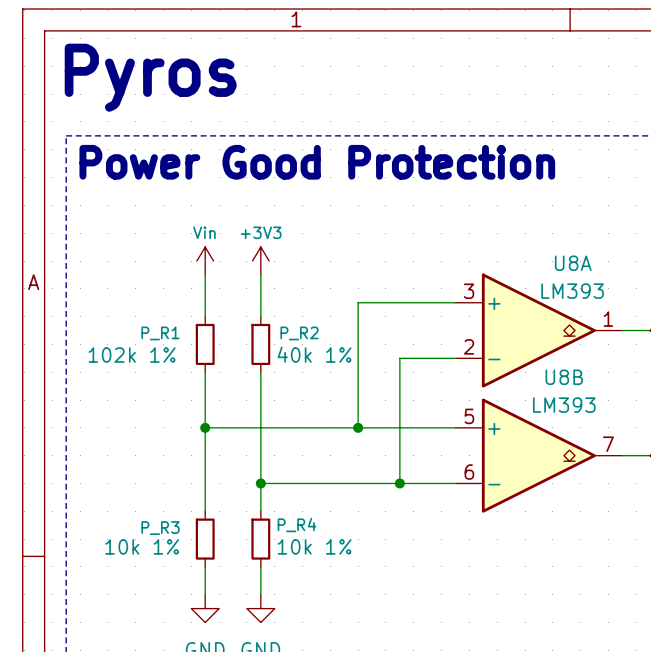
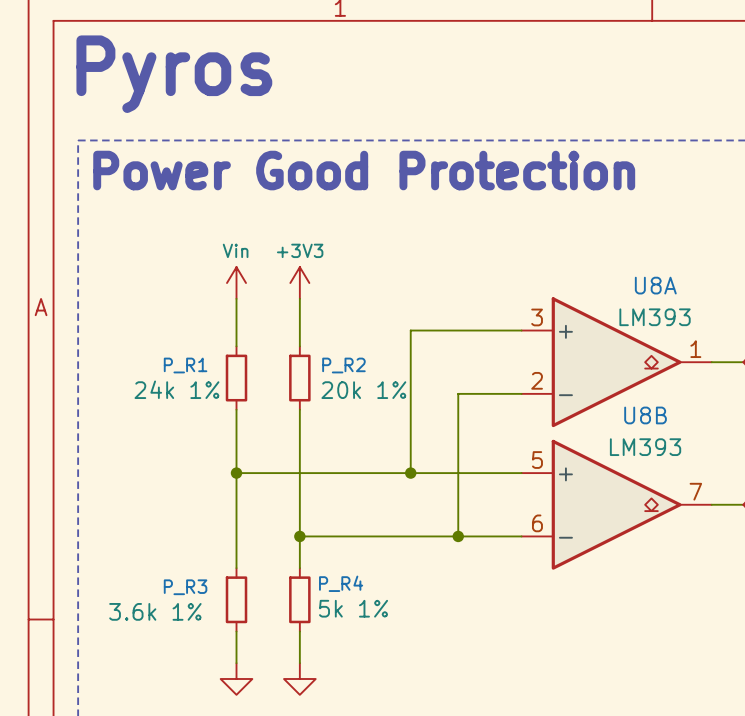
P_R2 value: 40k 1% (314, 354) -> 20k 1% (363, 390)
P_R1 value: 102k 1% (132, 355) -> 24k 1% (176, 389)
P_R3 value: 10k 1% (142, 546) -> 3.6k 1% (155, 611)
P_R4 value: 10k 1% (314, 546) -> 5k 1% (353, 608)

